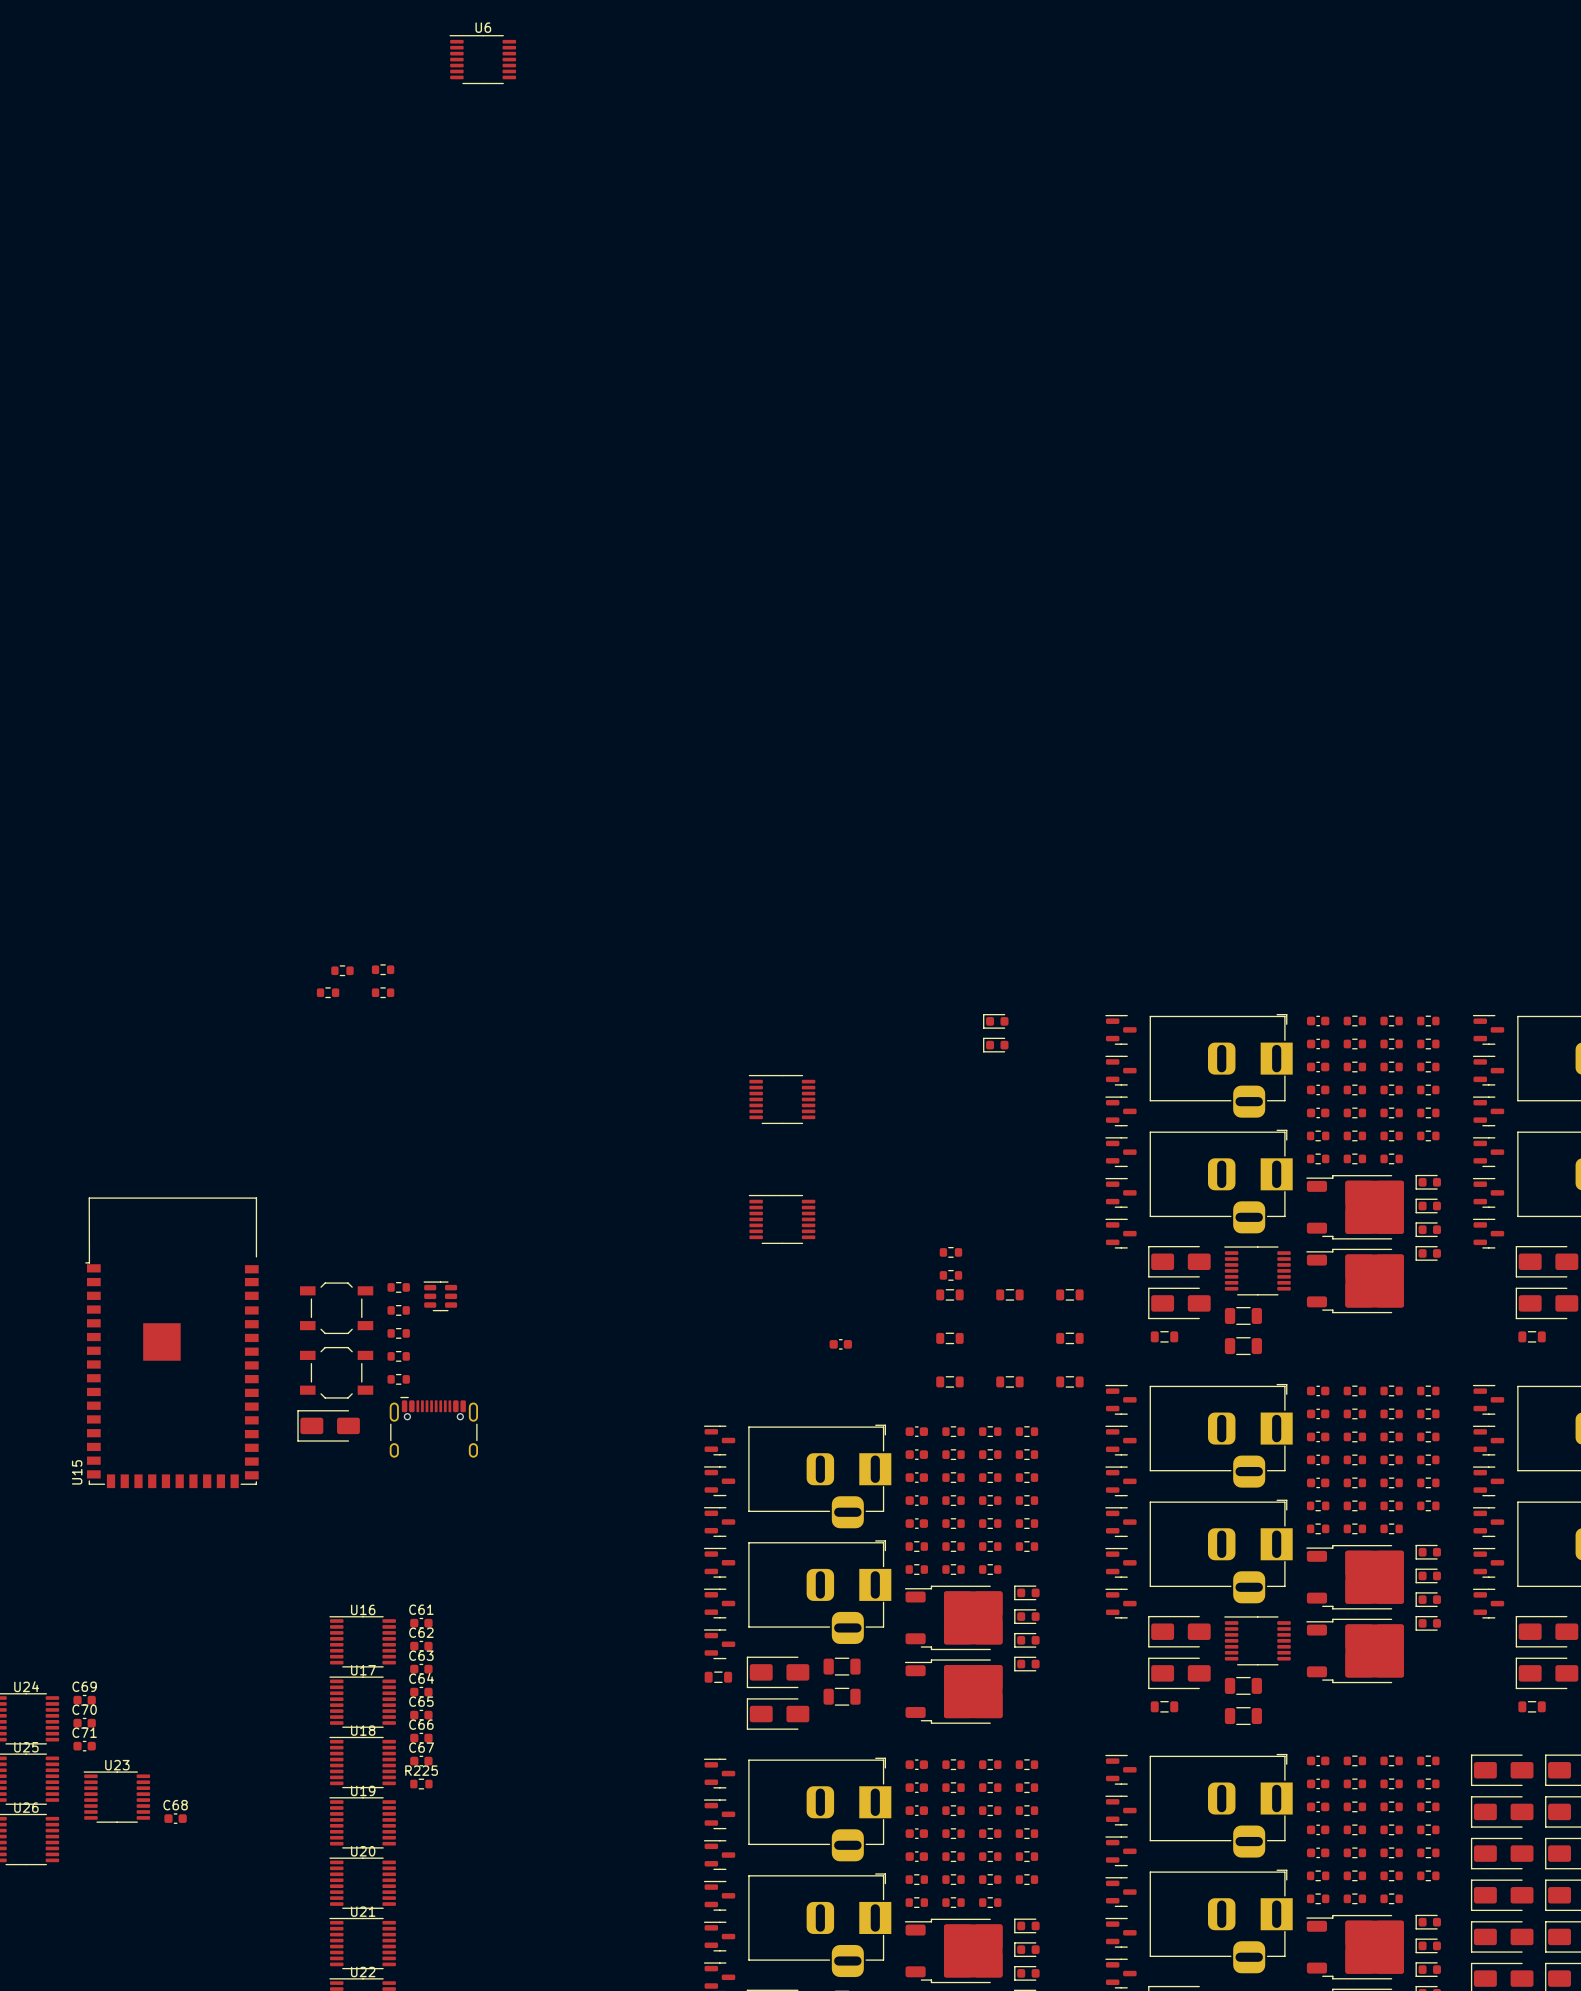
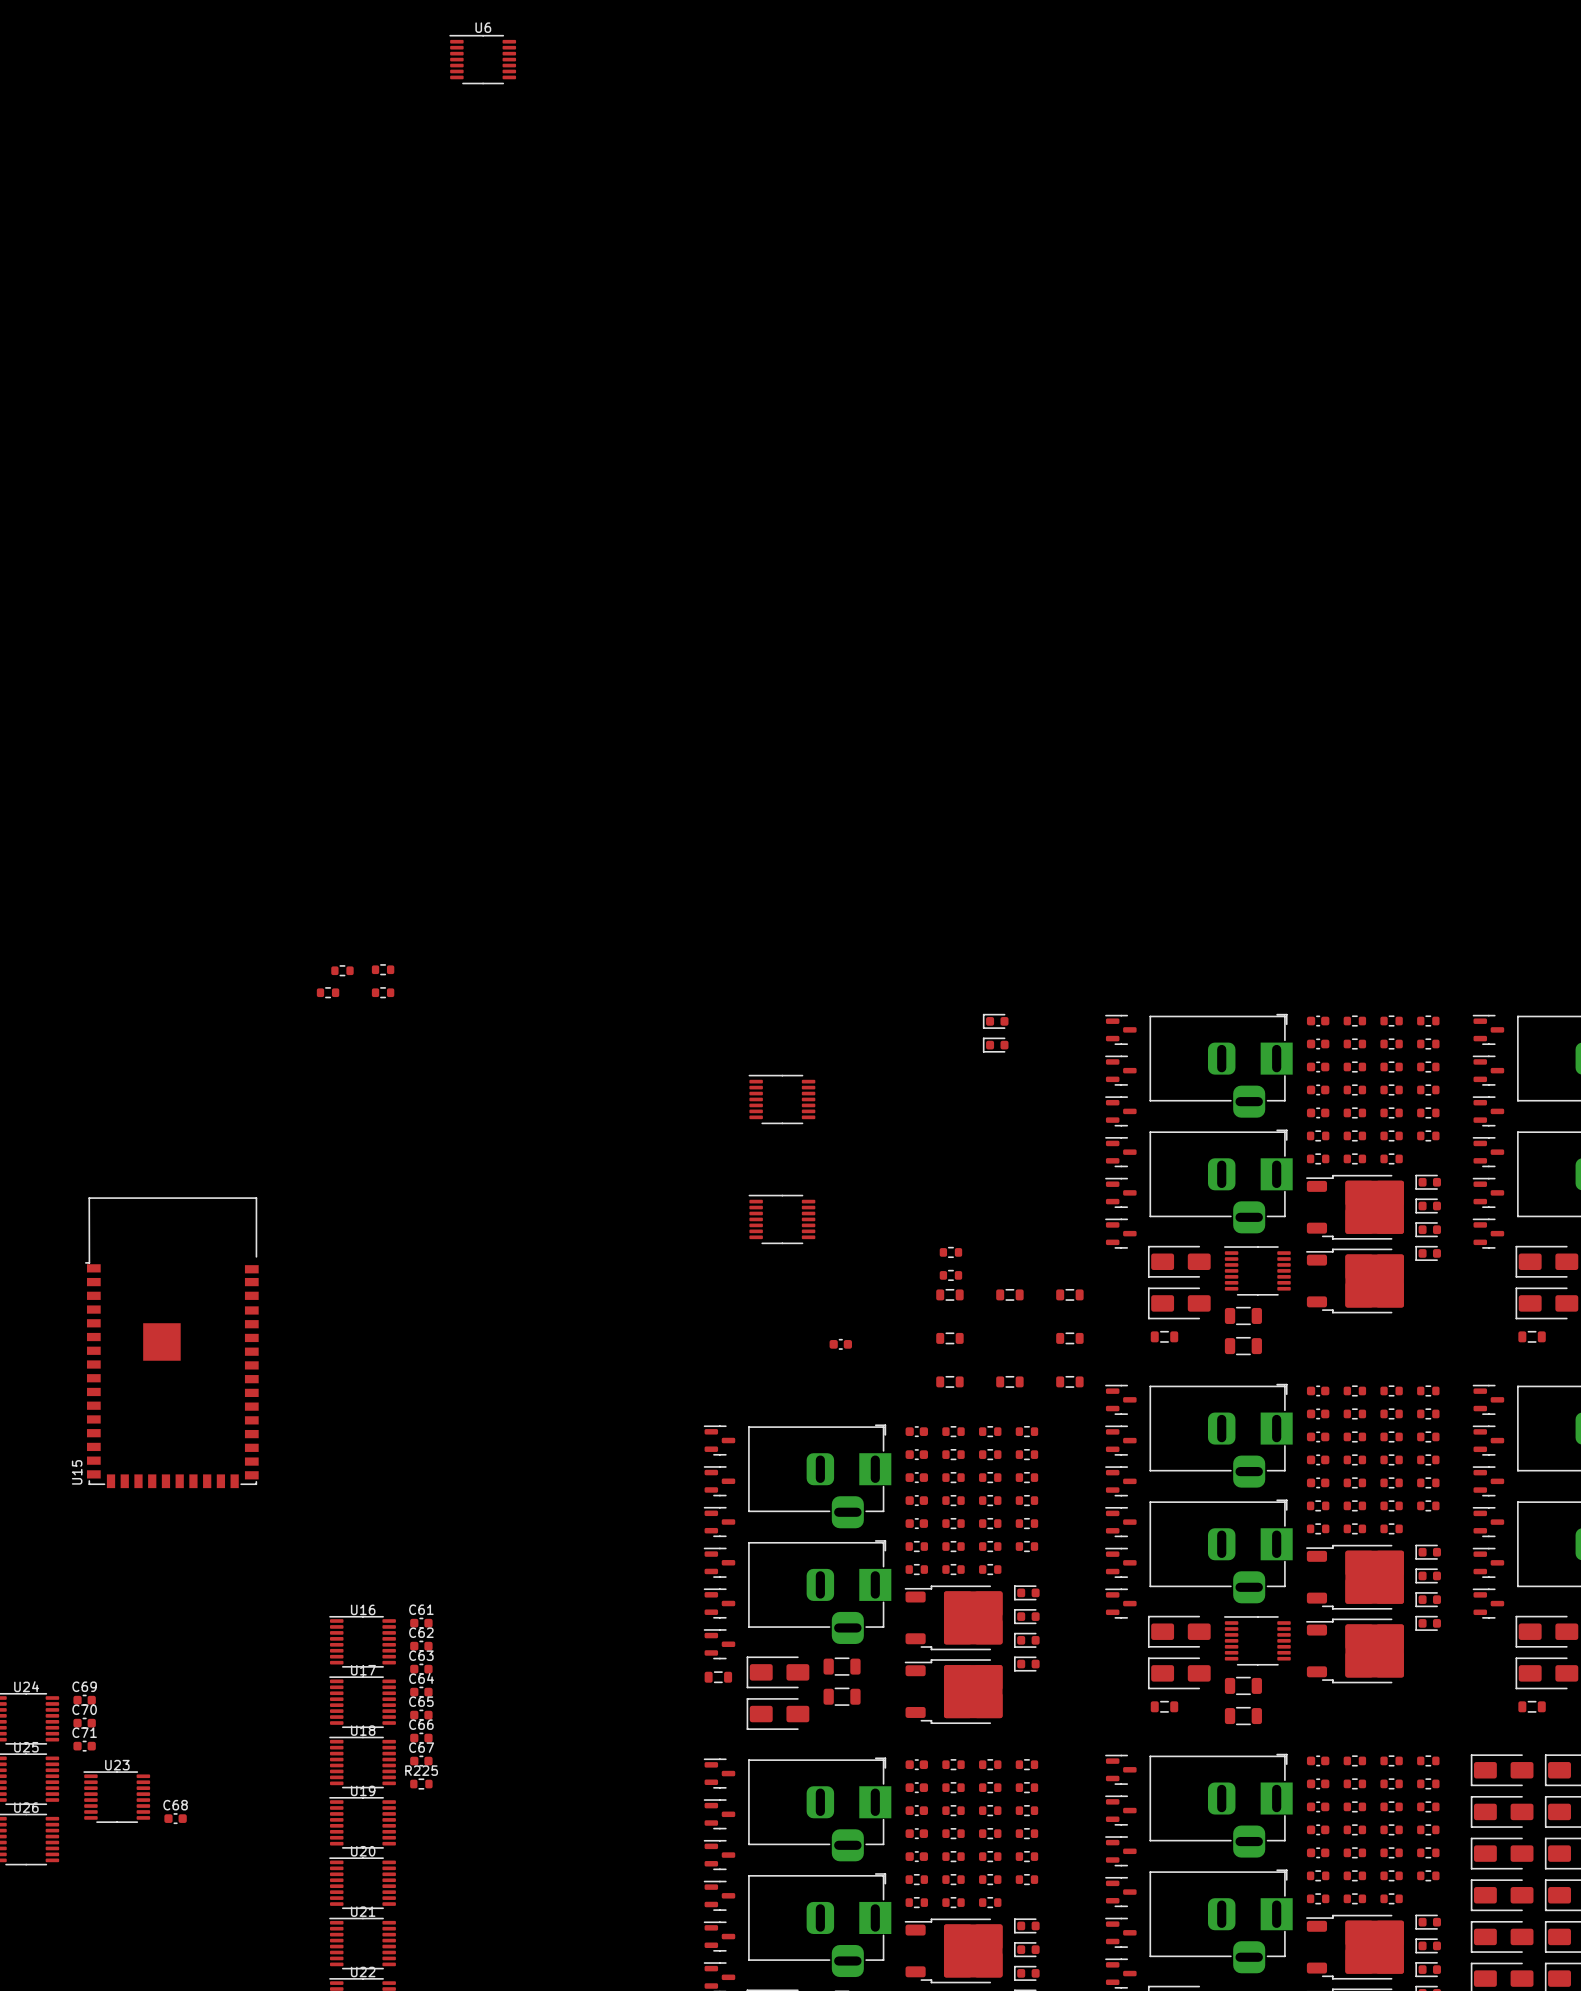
part: (398, 1287) -> none
part: (440, 1296) -> none
part: (336, 1308) -> none
part: (398, 1310) -> none
part: (398, 1333) -> none
part: (398, 1356) -> none
part: (336, 1372) -> none
part: (398, 1379) -> none
part: (328, 1425) -> none
part: (433, 1427) -> none

